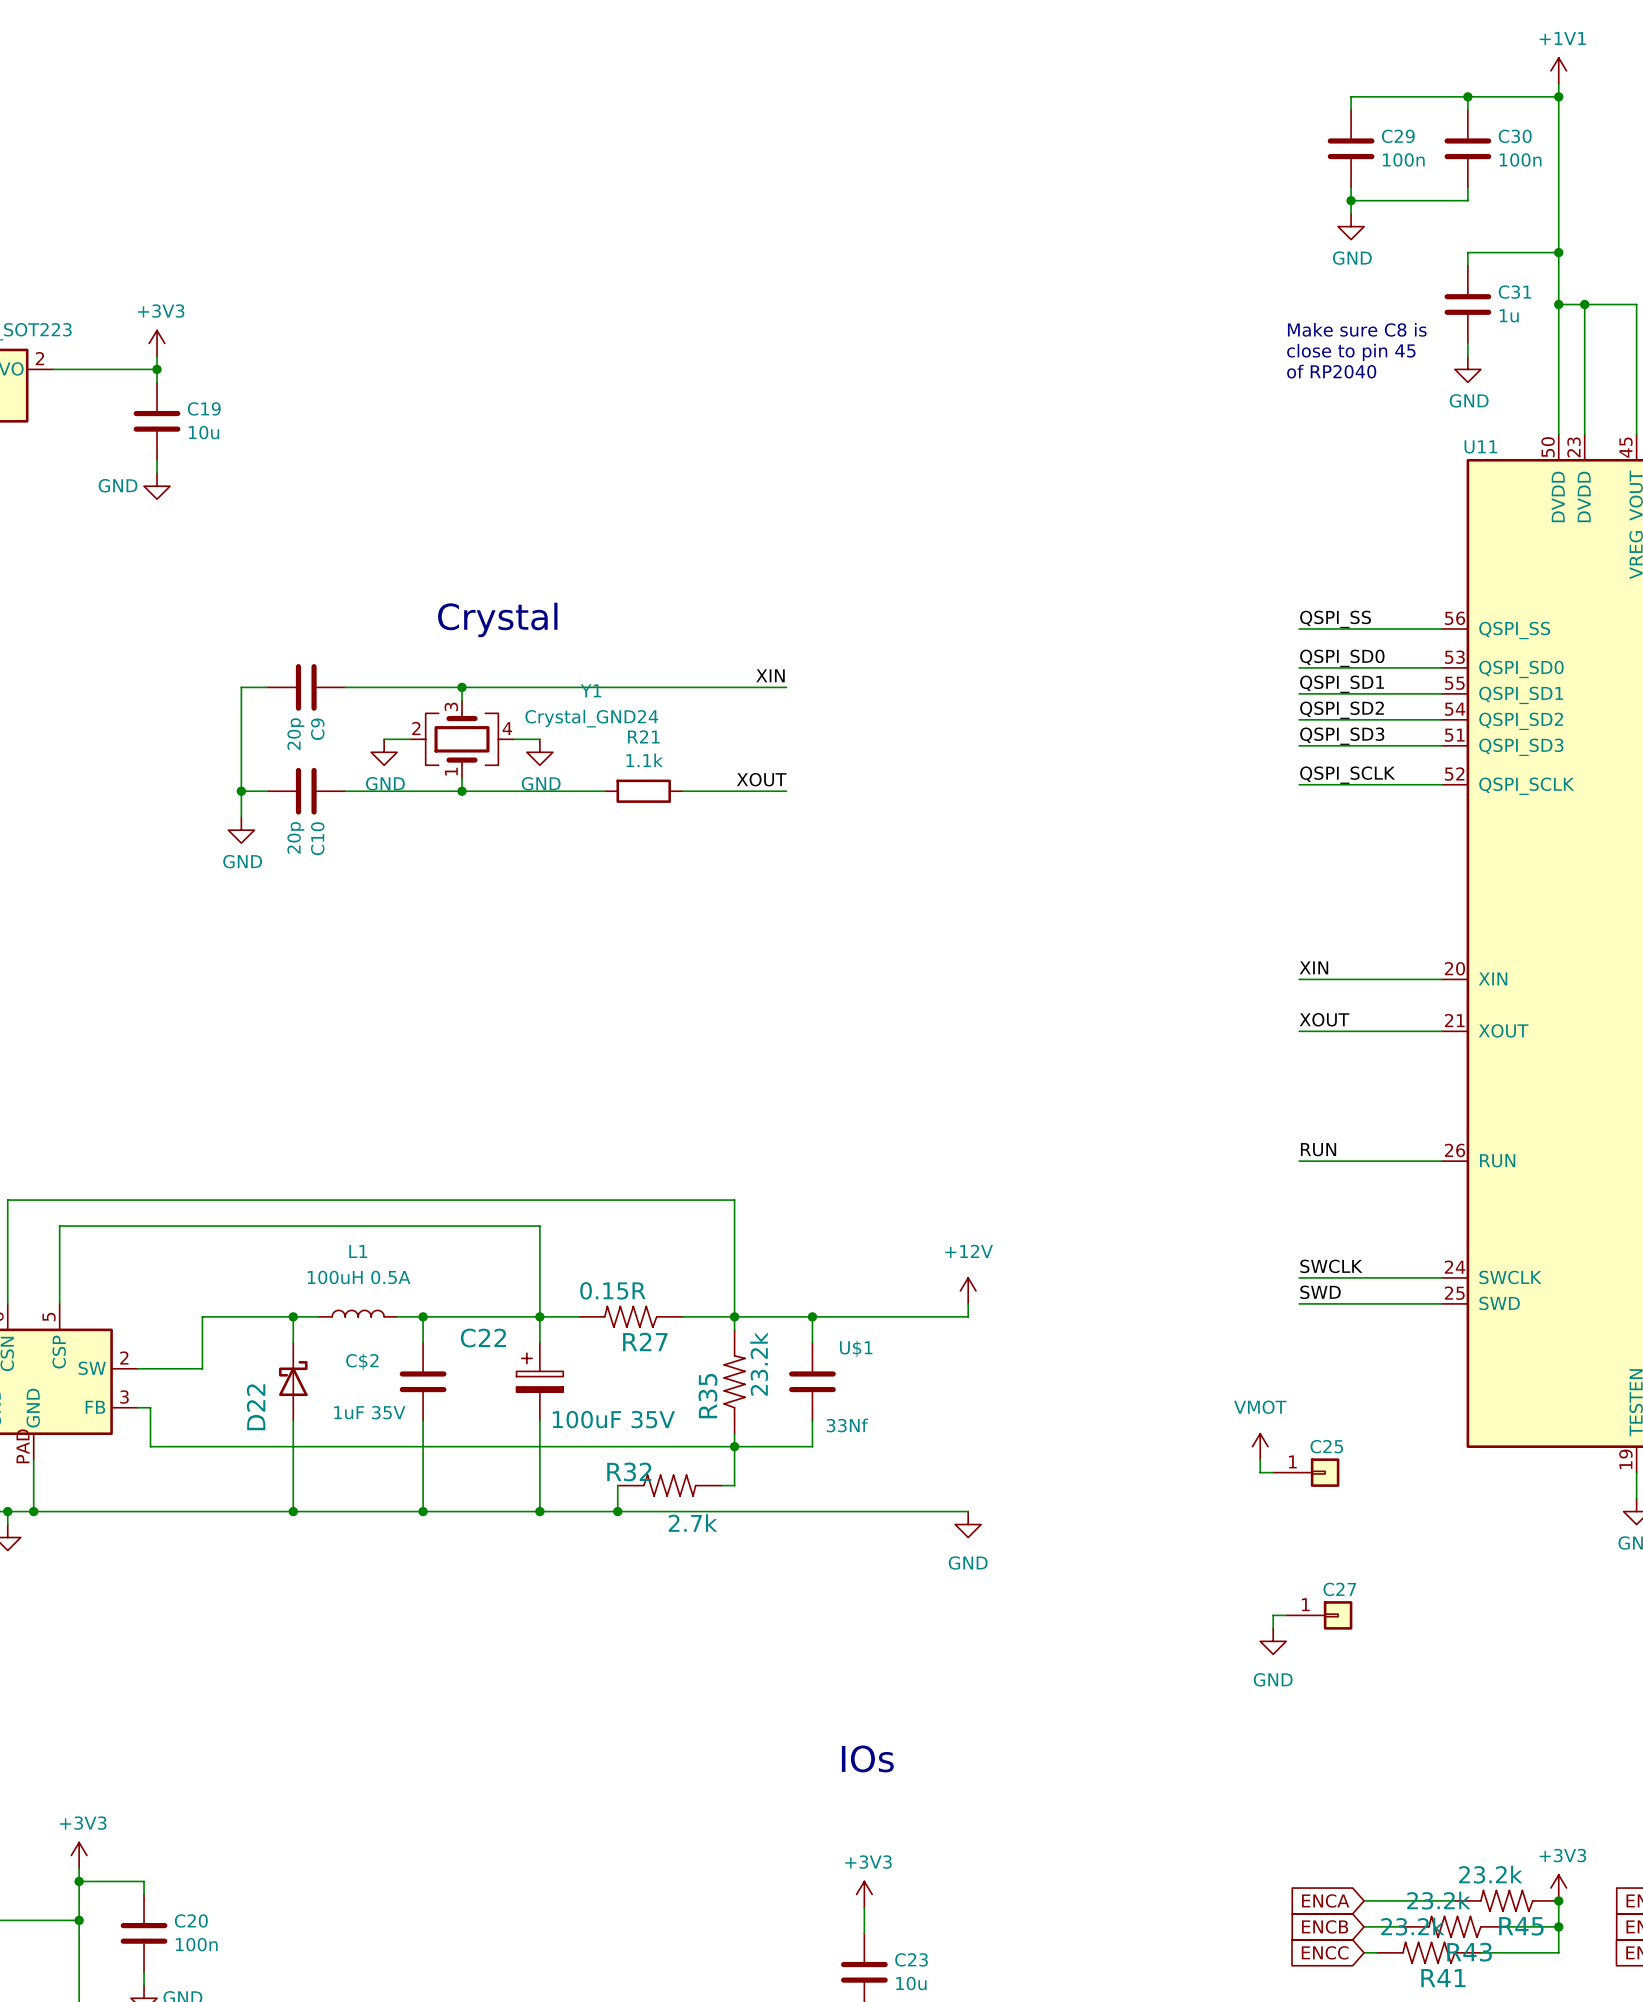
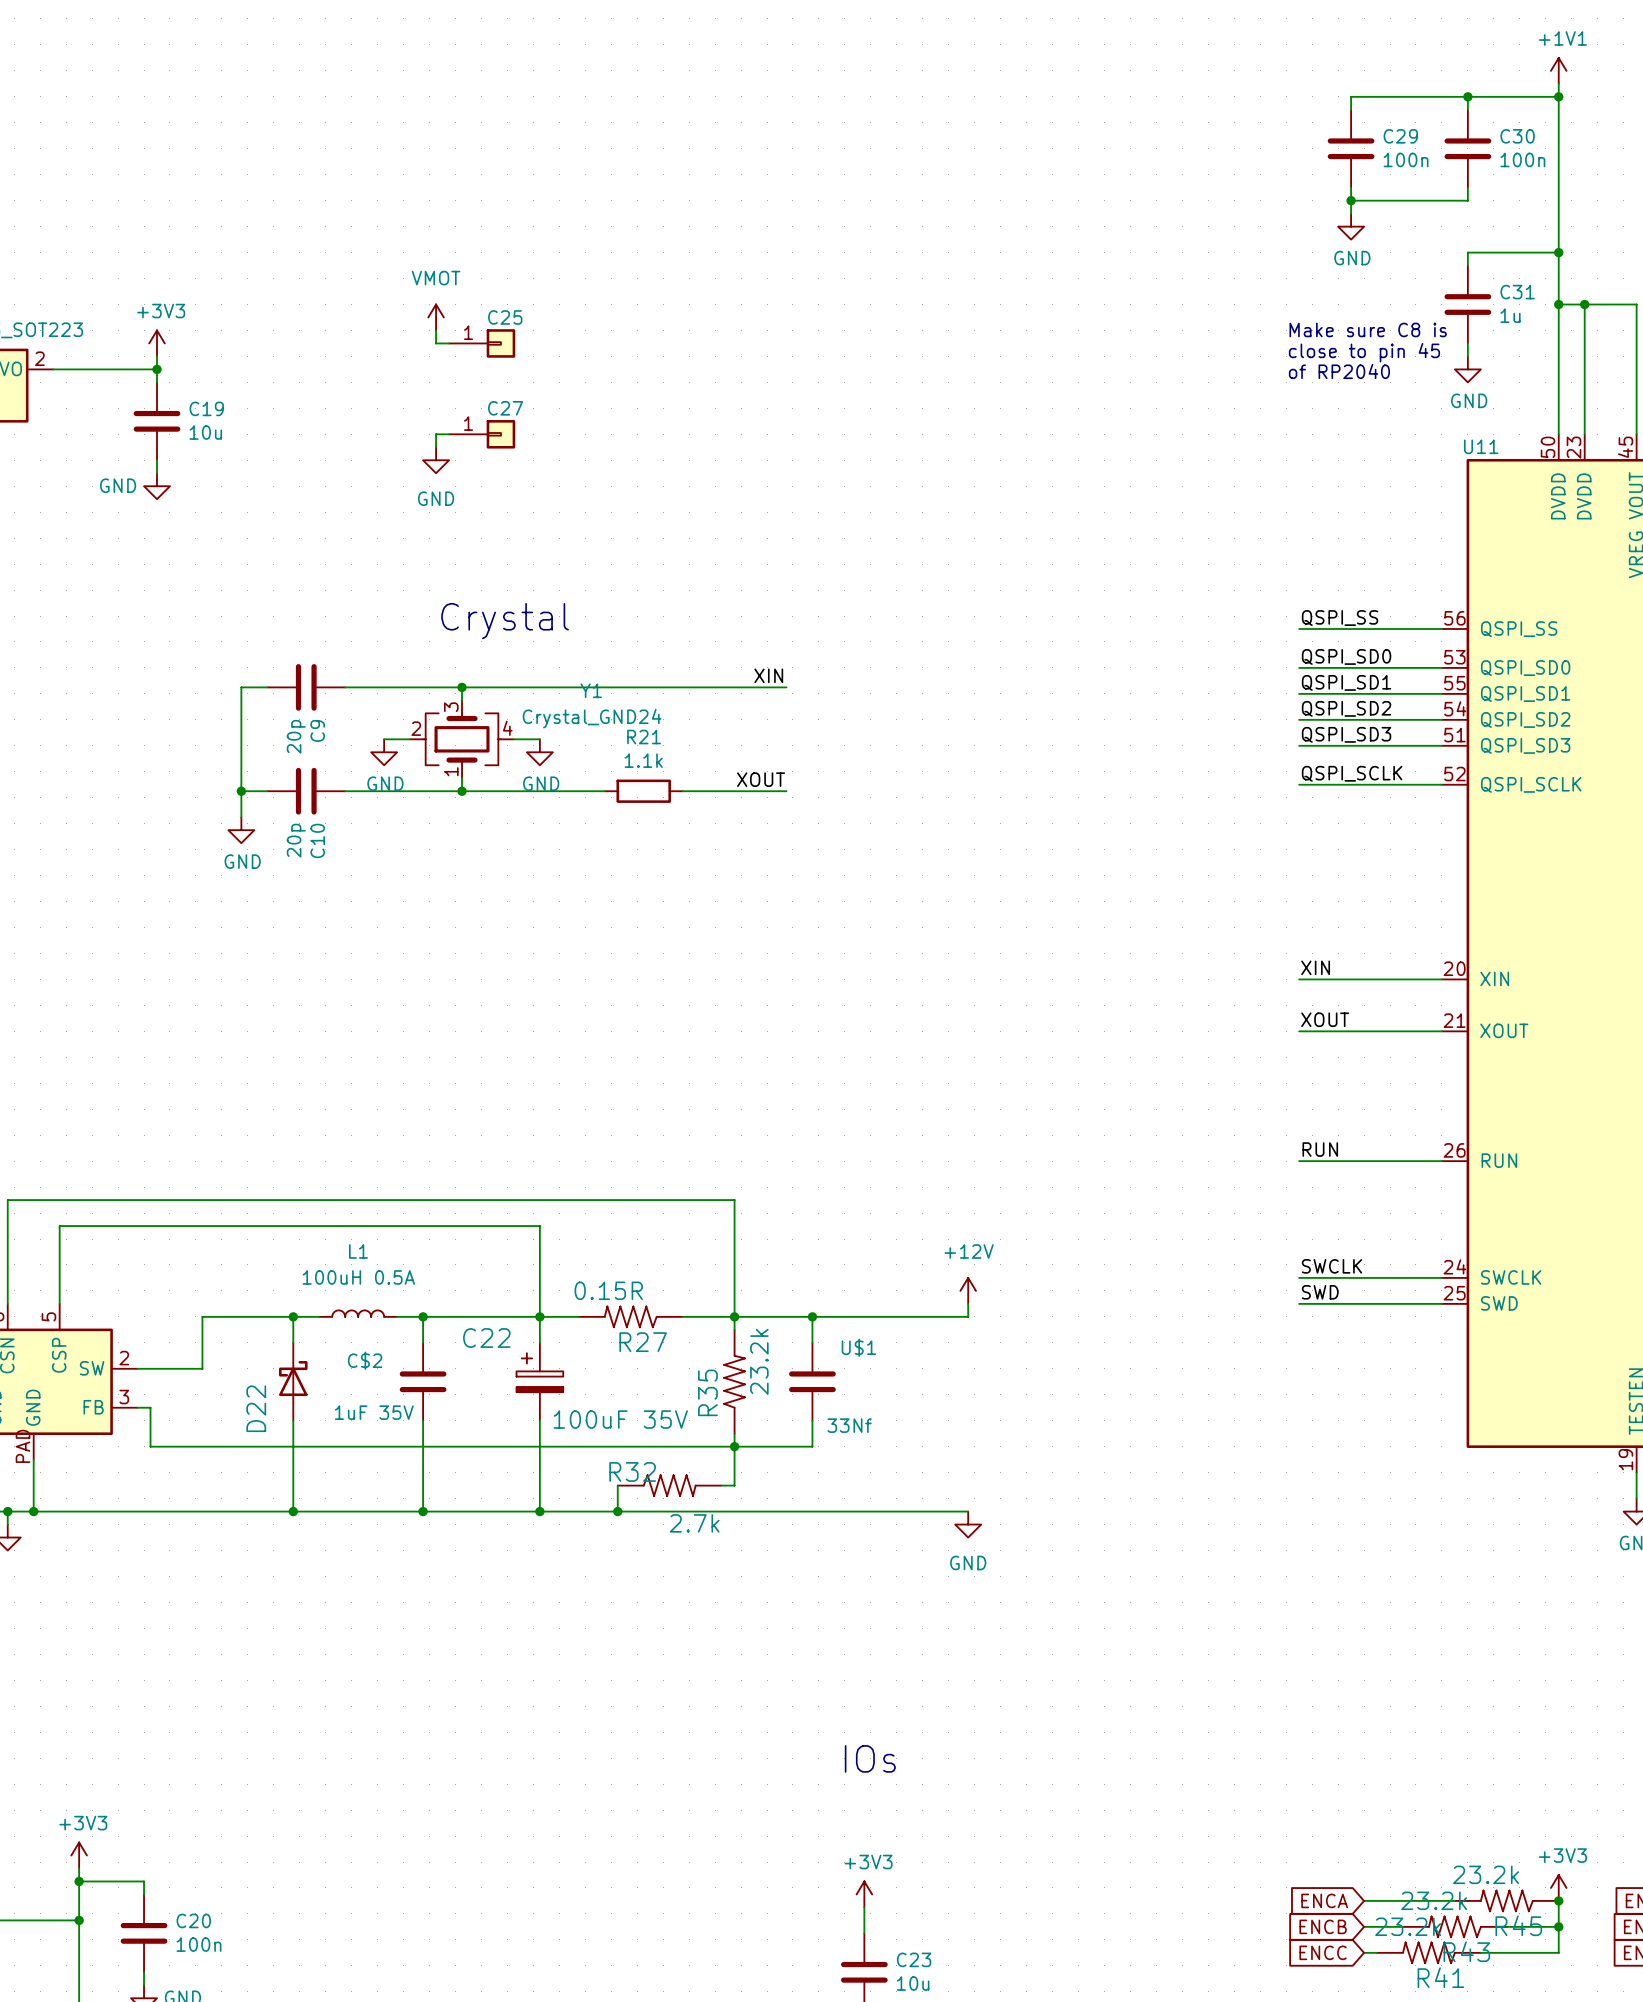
power symbol: none -> VMOT (436, 317)
wire: none -> (436, 330) (436, 343) (449, 343)
wire: none -> (449, 434) (436, 434) (436, 447)
power symbol: none -> GND (436, 460)
power symbol: VMOT (1260, 1446) -> none
wire: (1260, 1459) (1260, 1472) (1273, 1472) -> none
C25 position: (1306, 1472) -> (482, 343)
wire: (1286, 1615) (1273, 1615) (1273, 1628) -> none
C27 position: (1319, 1615) -> (482, 434)
power symbol: GND (1273, 1641) -> none

